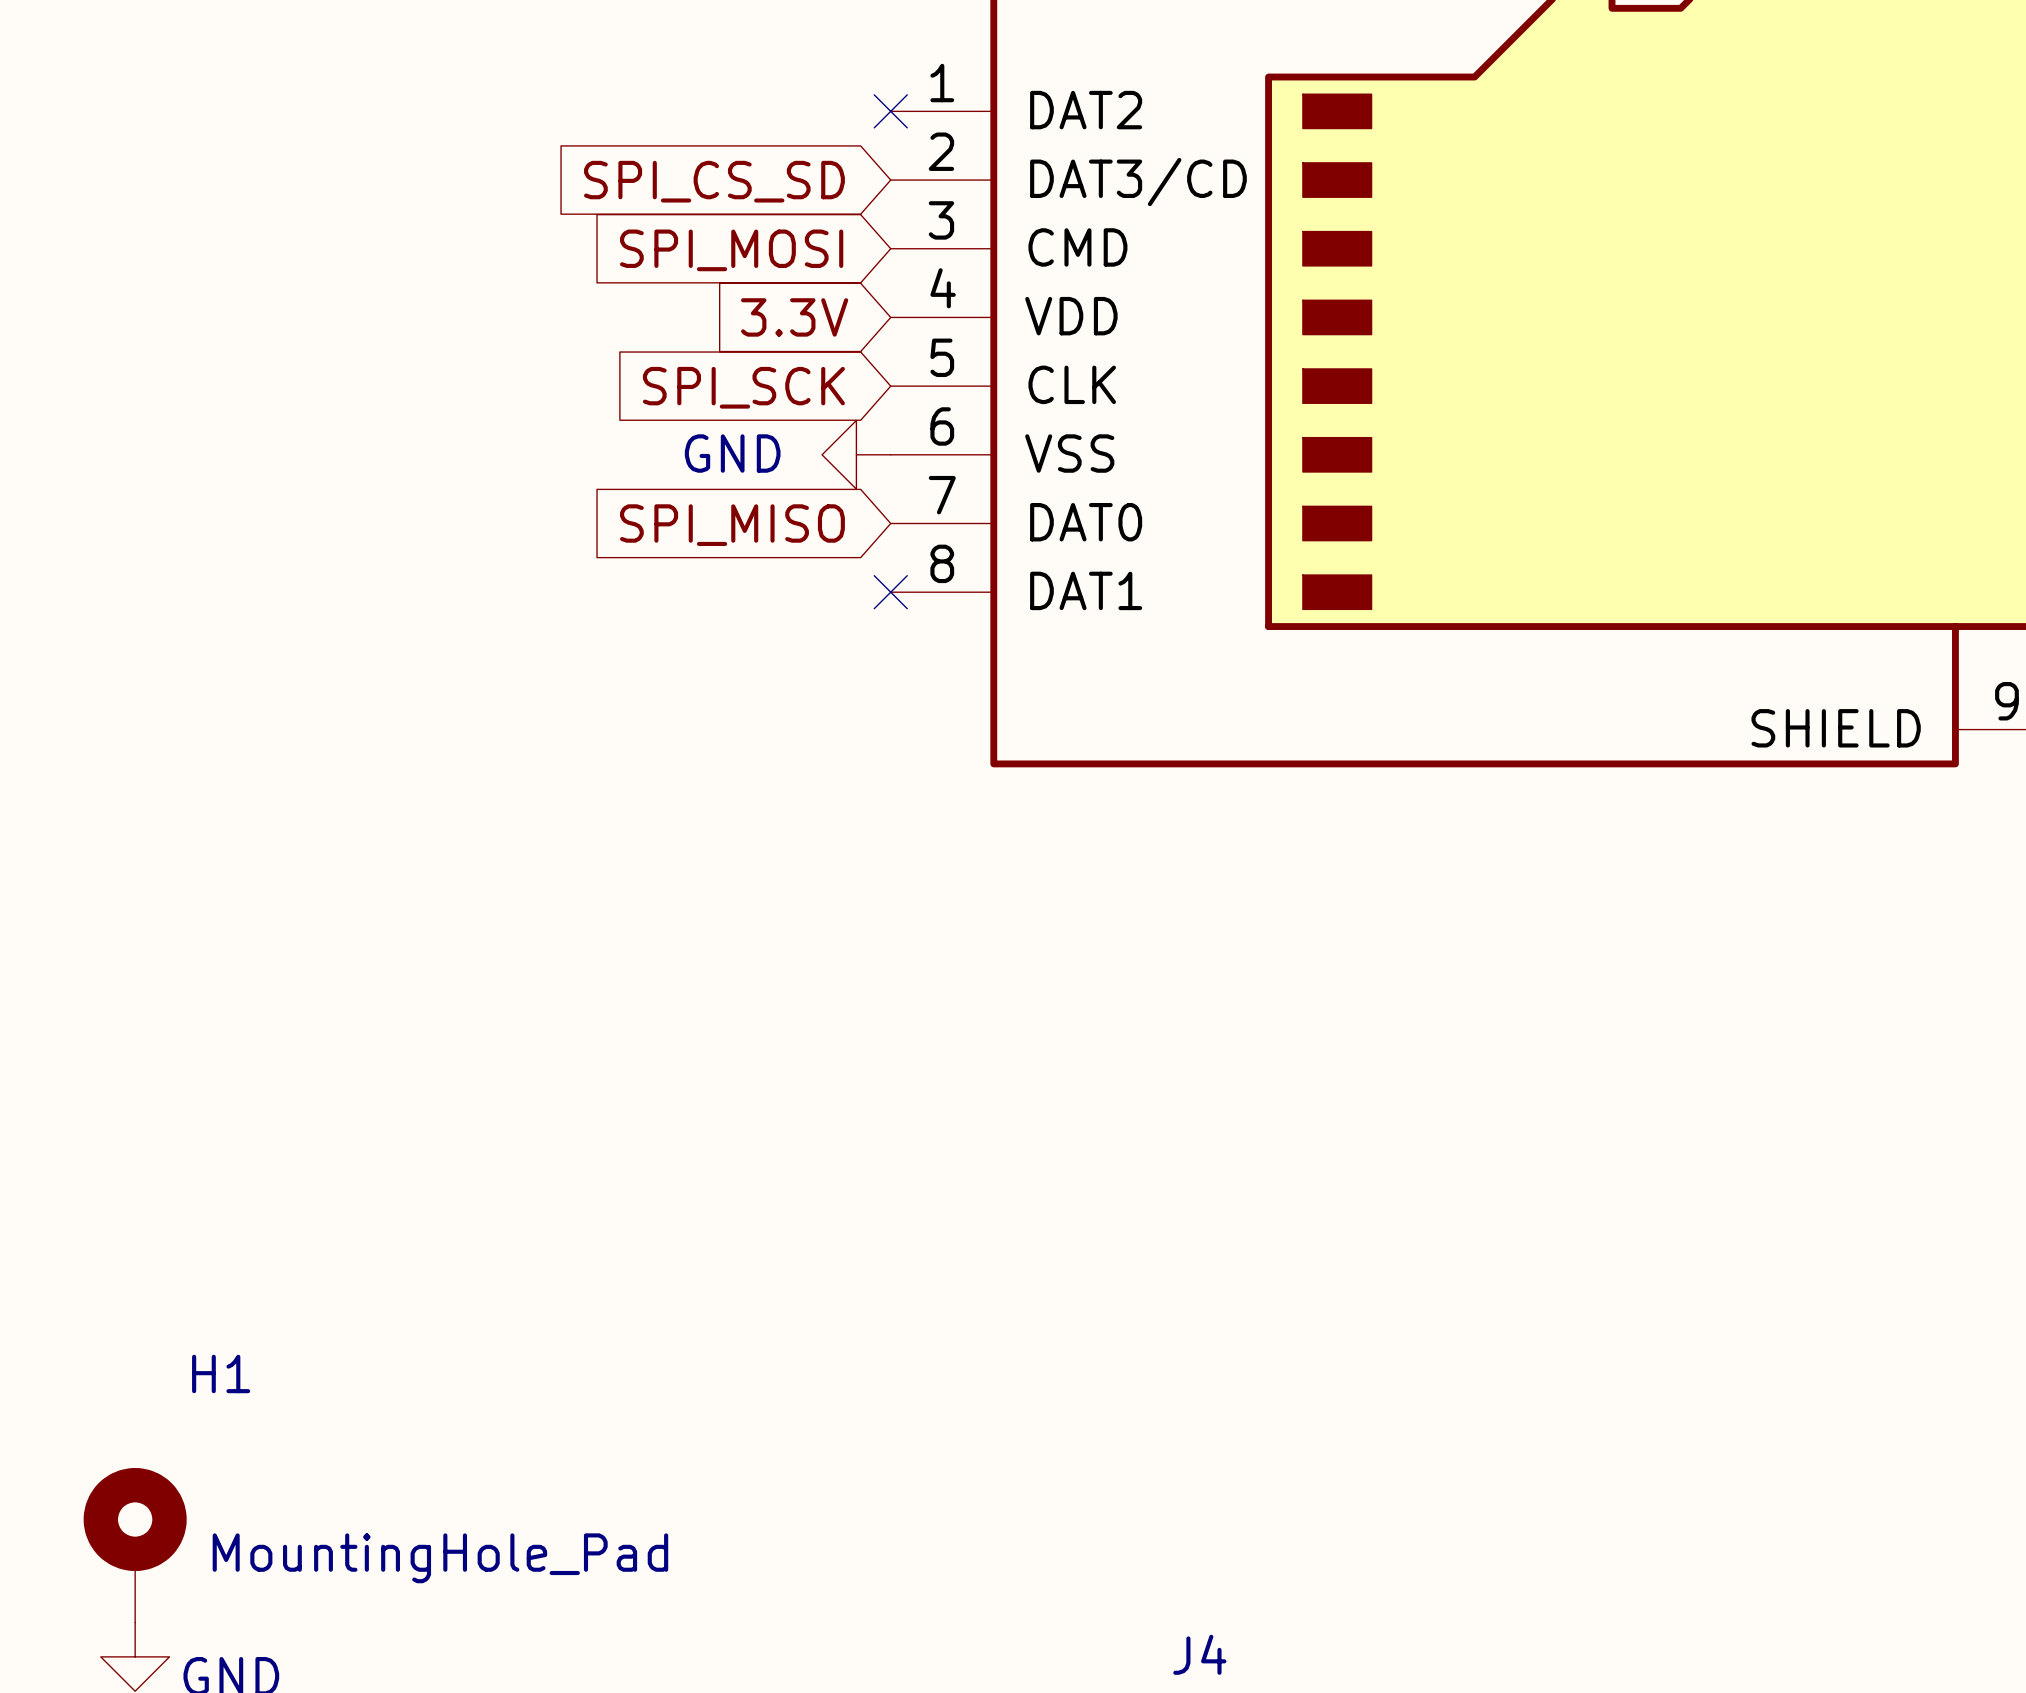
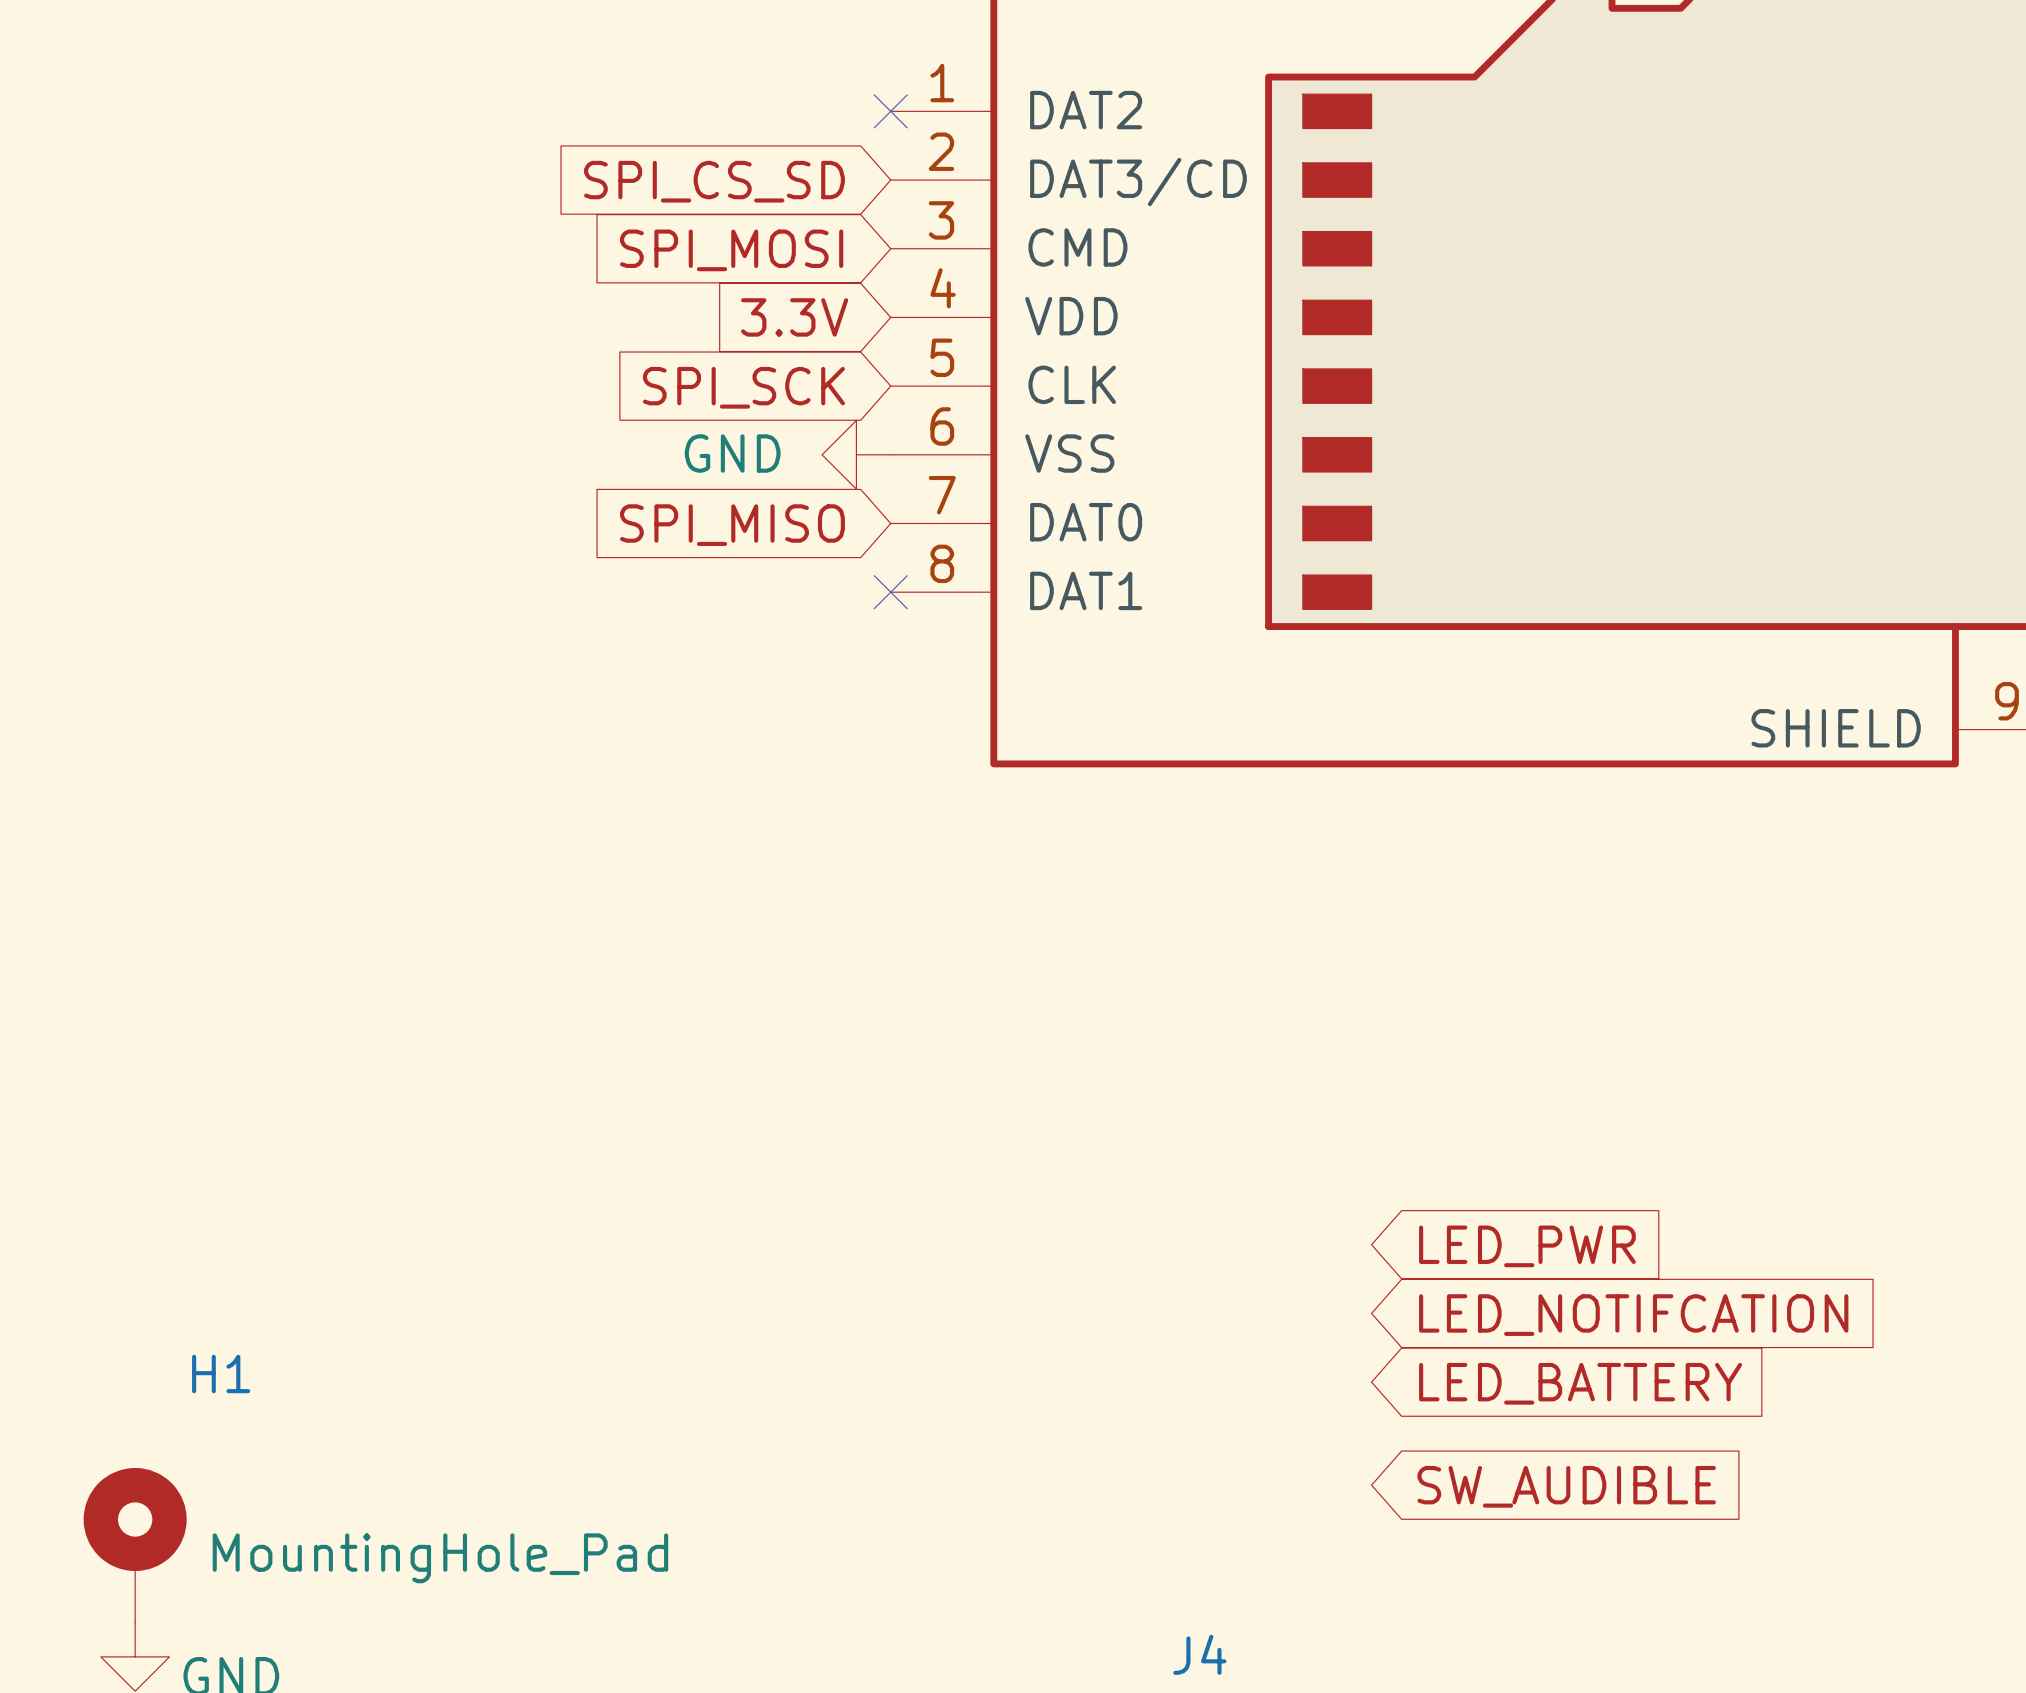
global label: none -> LED_PWR (1527, 1246)
global label: none -> LED_NOTIFCATION (1633, 1315)
global label: none -> LED_BATTERY (1580, 1383)
global label: none -> SW_AUDIBLE (1566, 1486)

